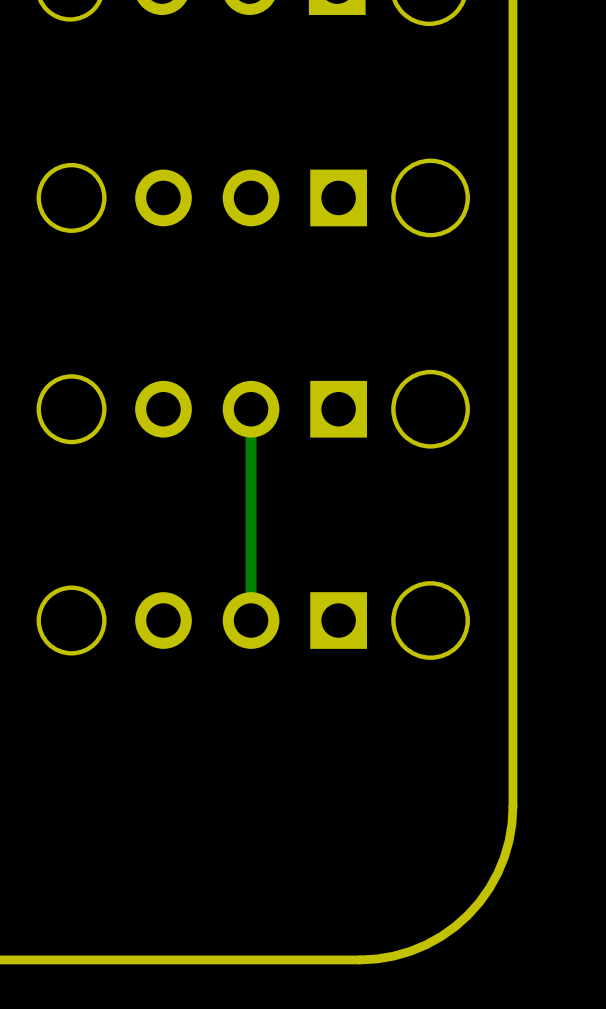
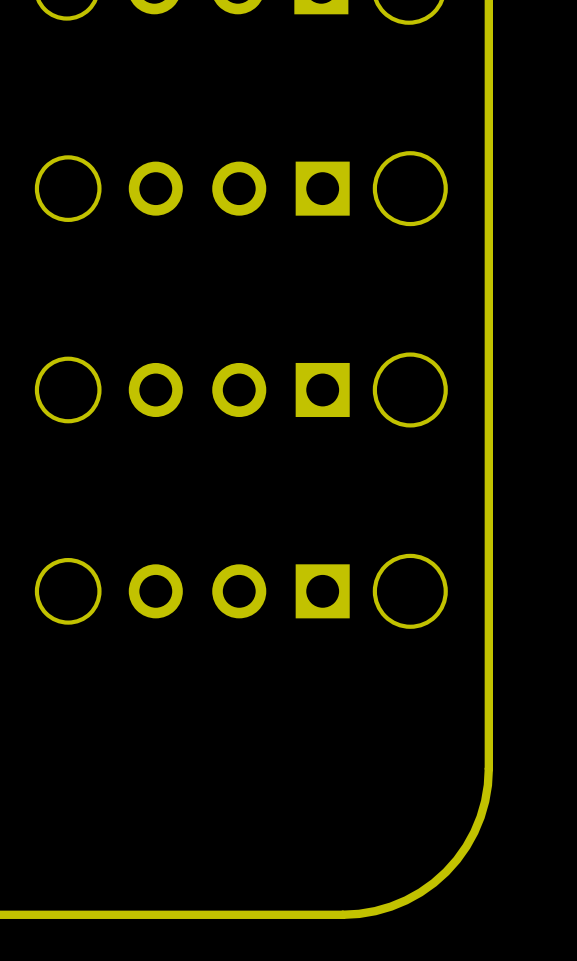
track: (251, 409) (251, 620) -> none

